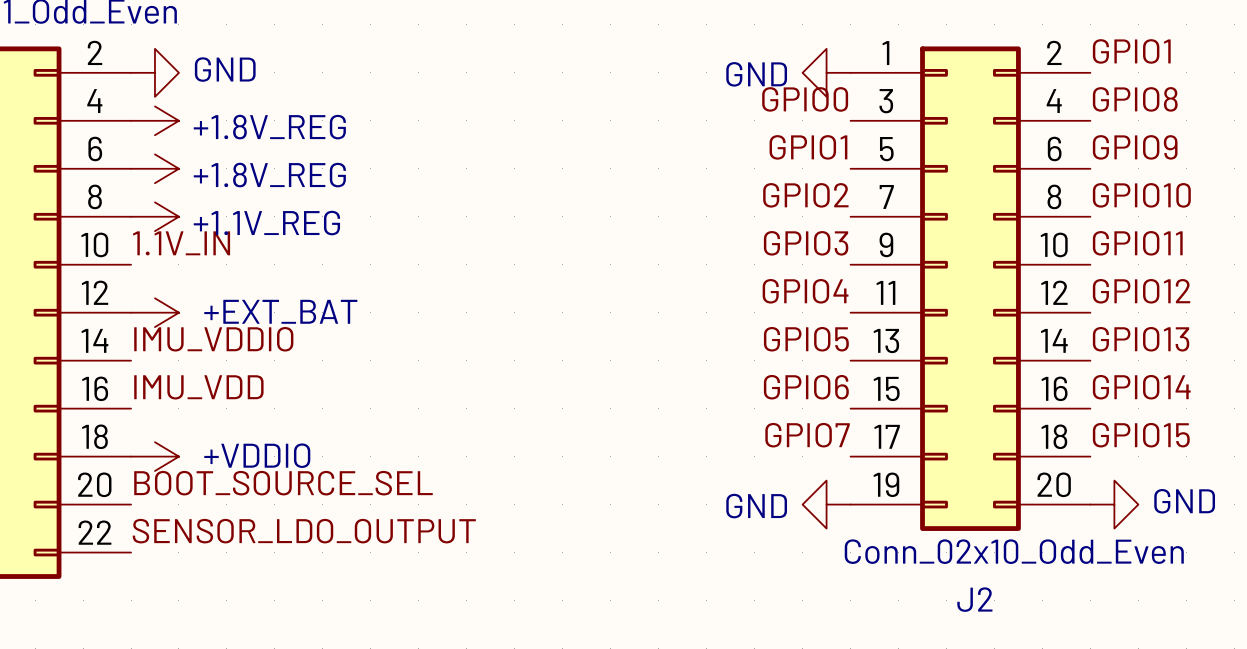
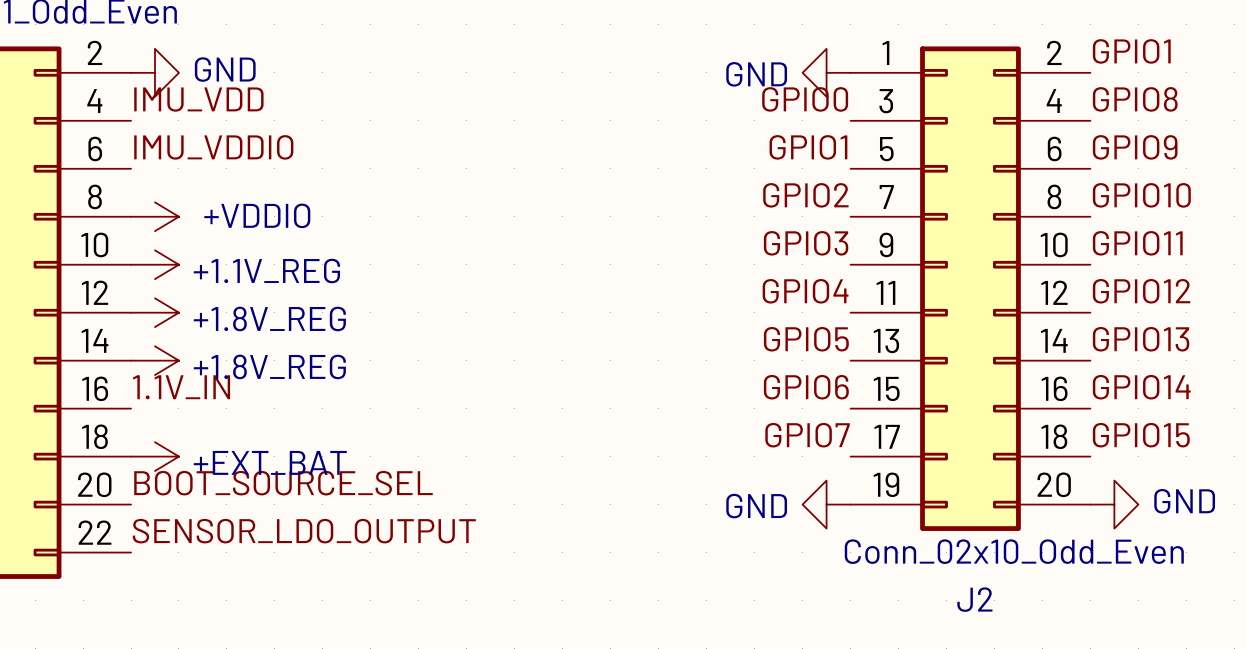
label: none -> IMU_VDD (198, 99)
power symbol: +1.8V_REG (154, 120) -> none
power symbol: +1.8V_REG (154, 168) -> none
power symbol: +1.1V_REG (154, 216) -> +VDDIO (154, 216)
label: 1.1V_IN (181, 243) -> none
power symbol: none -> +1.1V_REG (154, 264)
power symbol: +EXT_BAT (154, 312) -> +1.8V_REG (154, 312)
label position: IMU_VDDIO (213, 339) -> IMU_VDDIO (213, 147)
power symbol: none -> +1.8V_REG (154, 360)
label: IMU_VDD (198, 387) -> 1.1V_IN (181, 387)
power symbol: +VDDIO (154, 456) -> +EXT_BAT (154, 456)

